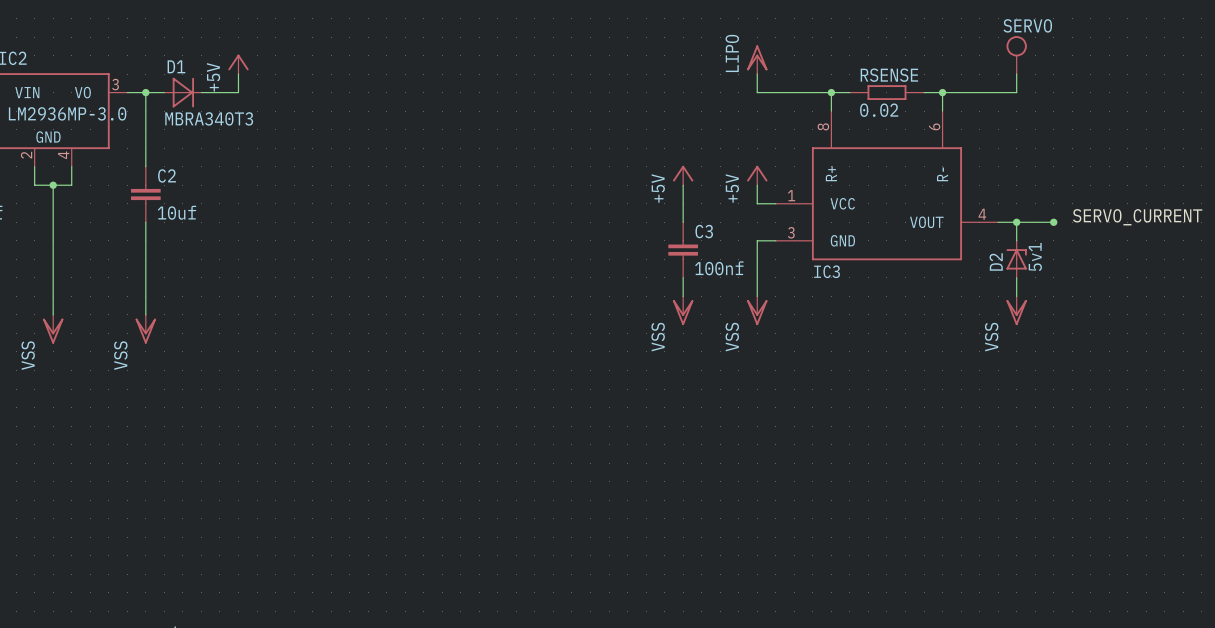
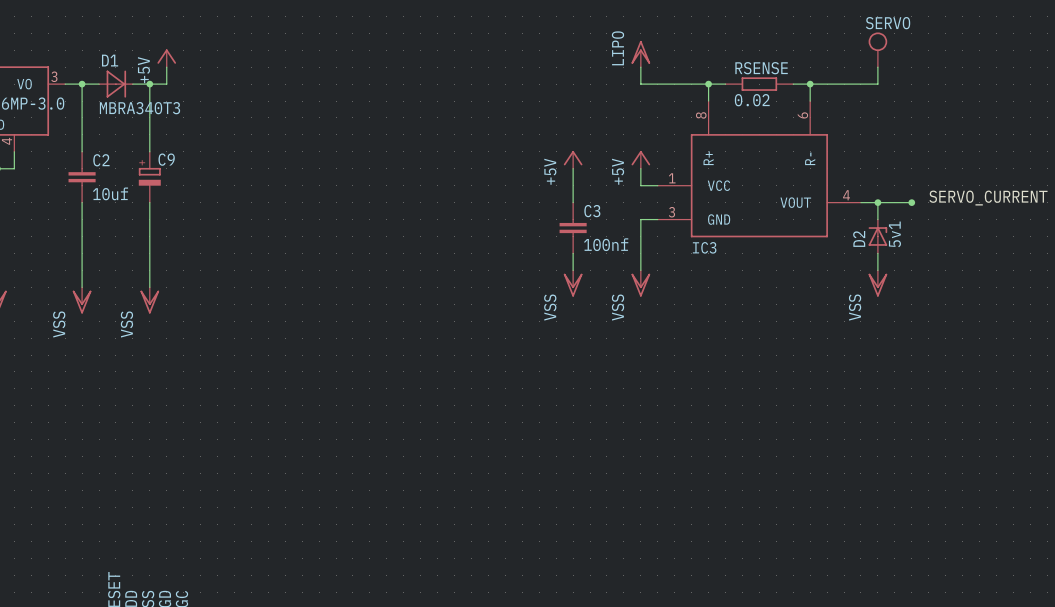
wire: none -> (149, 84) (149, 151)
junction: none -> (149, 84)
C9: none -> (149, 177)
wire: none -> (149, 202) (149, 287)
power symbol: none -> VSS (149, 300)

